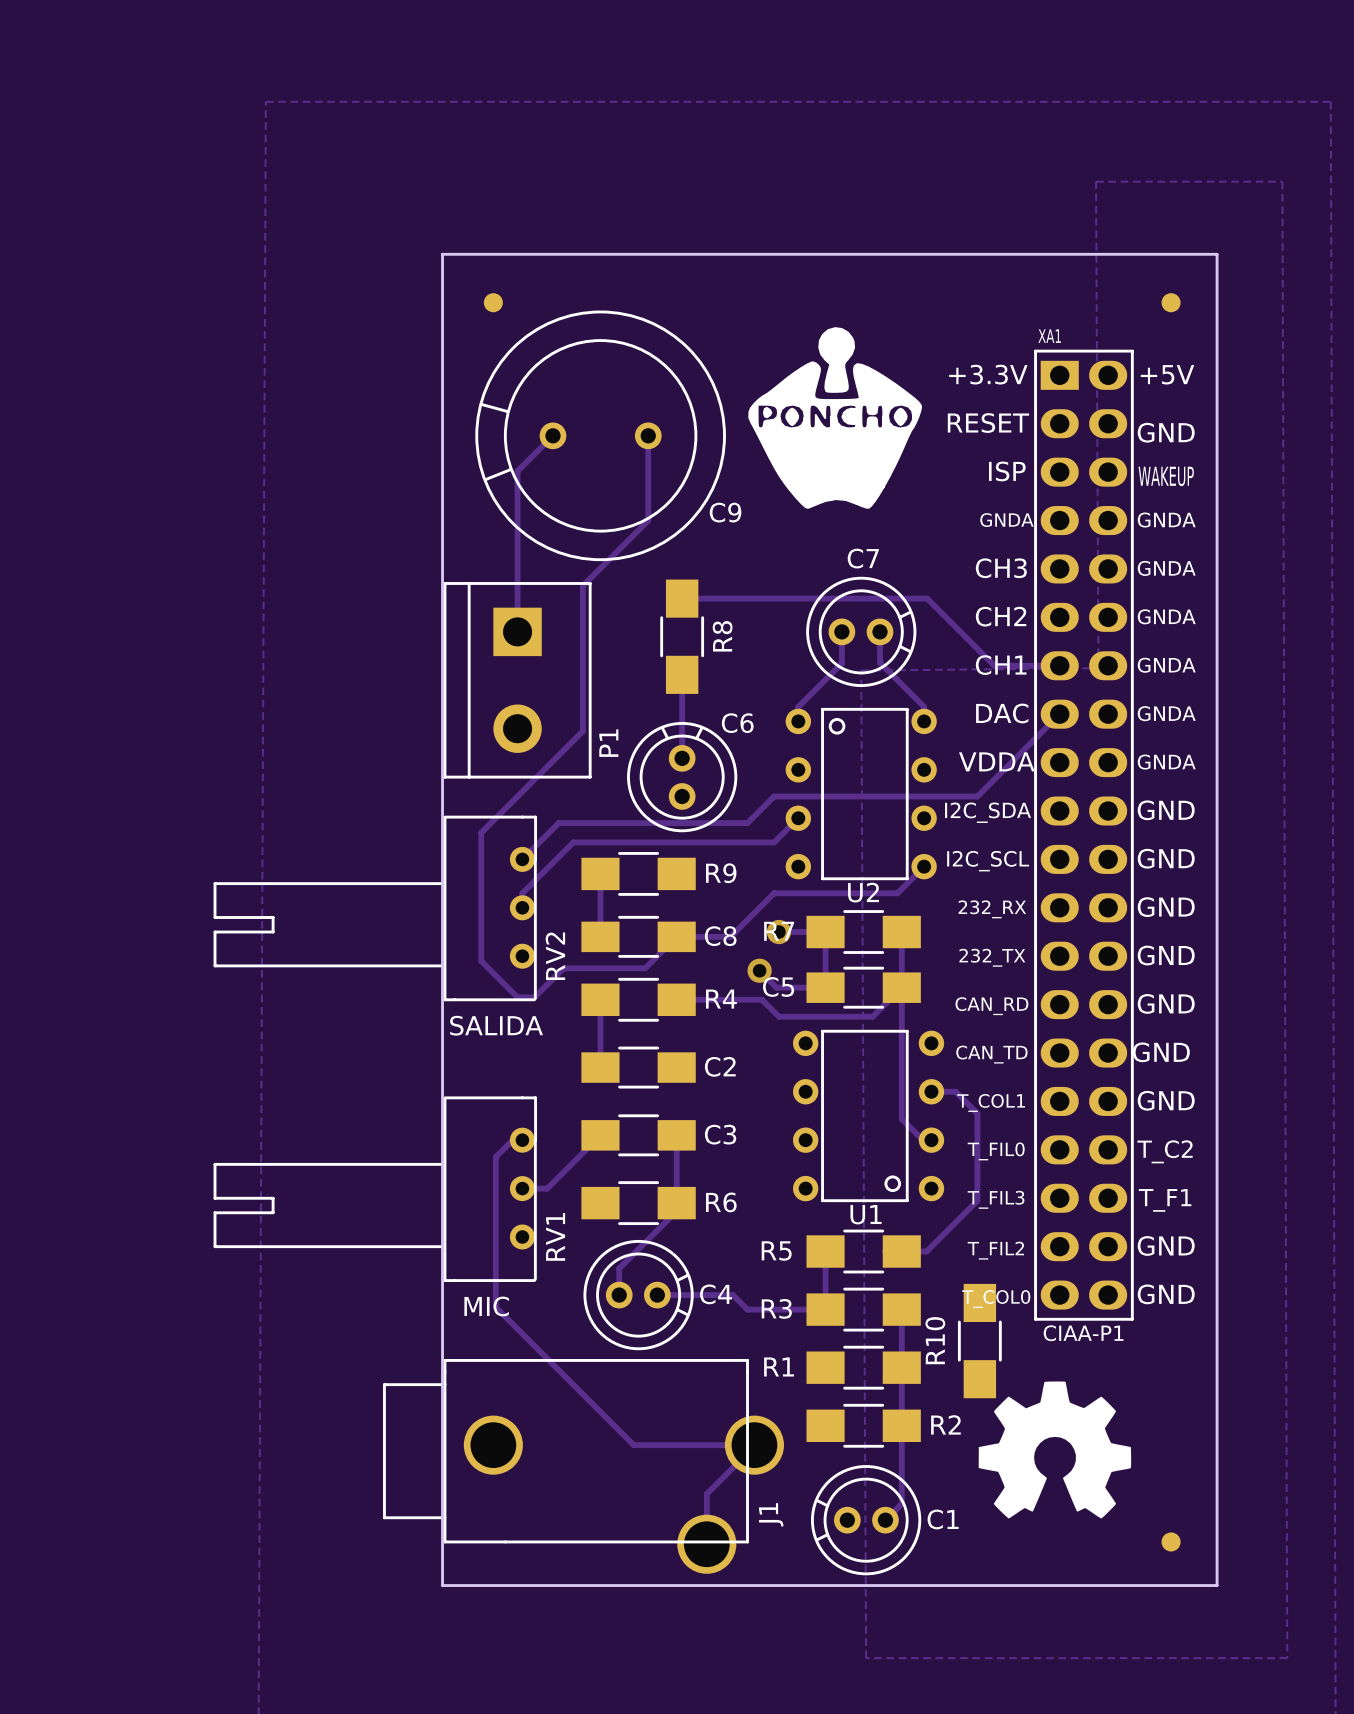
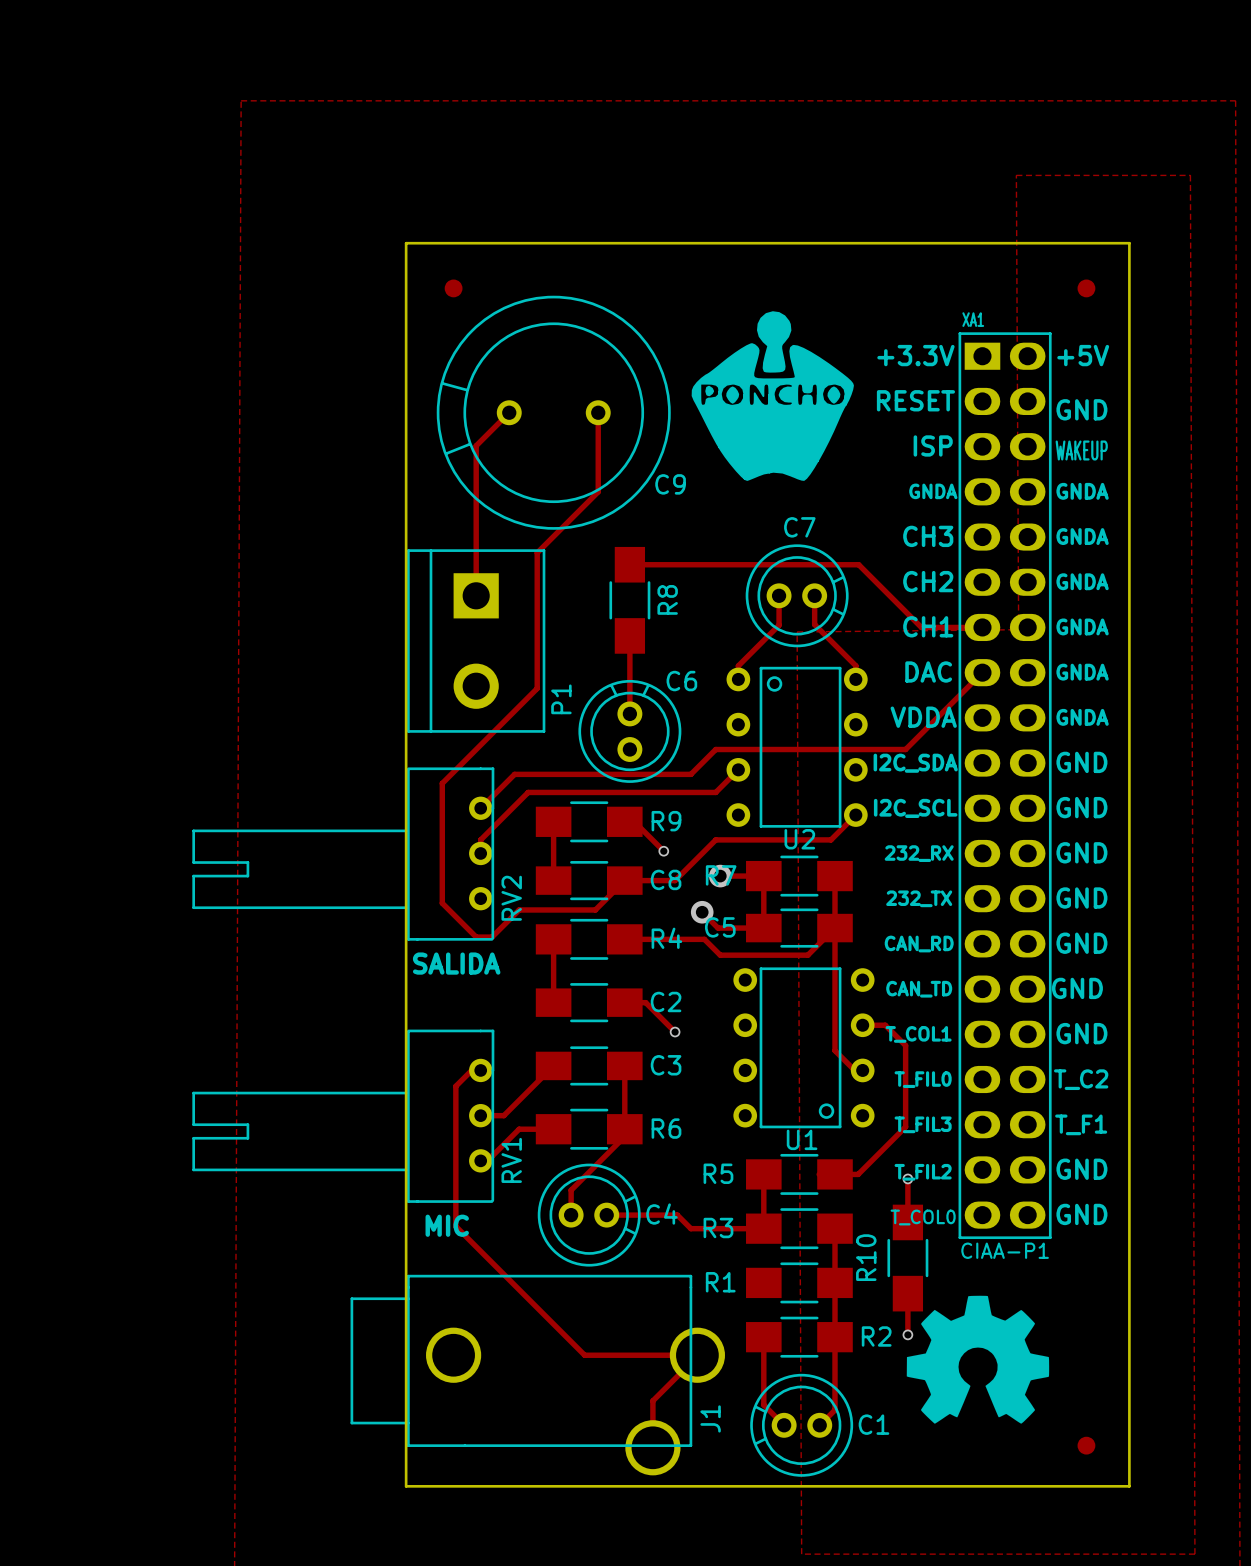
track: none -> (624, 821) (634, 821) (663, 851)
via: none -> (663, 851)
track: none -> (624, 1002) (645, 1002) (675, 1032)
via: none -> (675, 1032)
track: none -> (553, 1129) (519, 1129) (492, 1156) (485, 1156) (480, 1160)
track: none -> (907, 1178) (907, 1222)
via: none -> (907, 1178)
track: none -> (907, 1293) (907, 1334)
via: none -> (907, 1334)
track: none -> (763, 1337) (763, 1404) (784, 1425)

